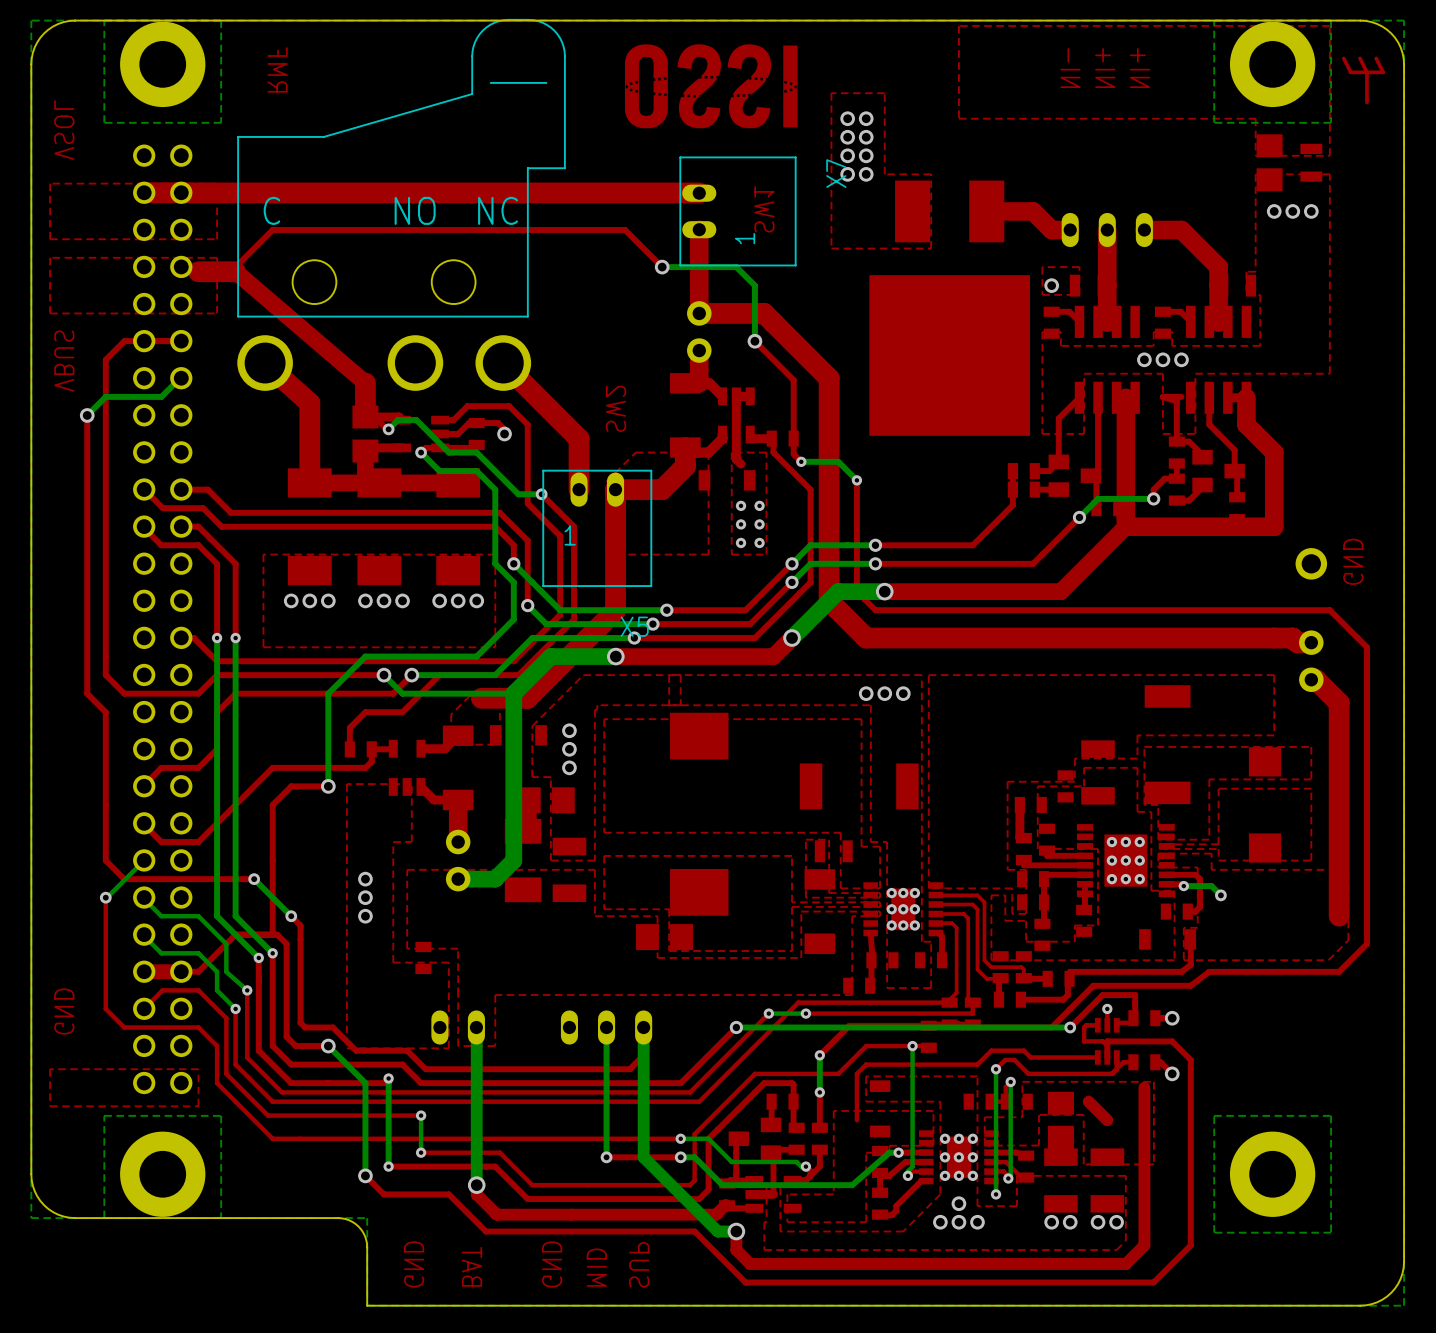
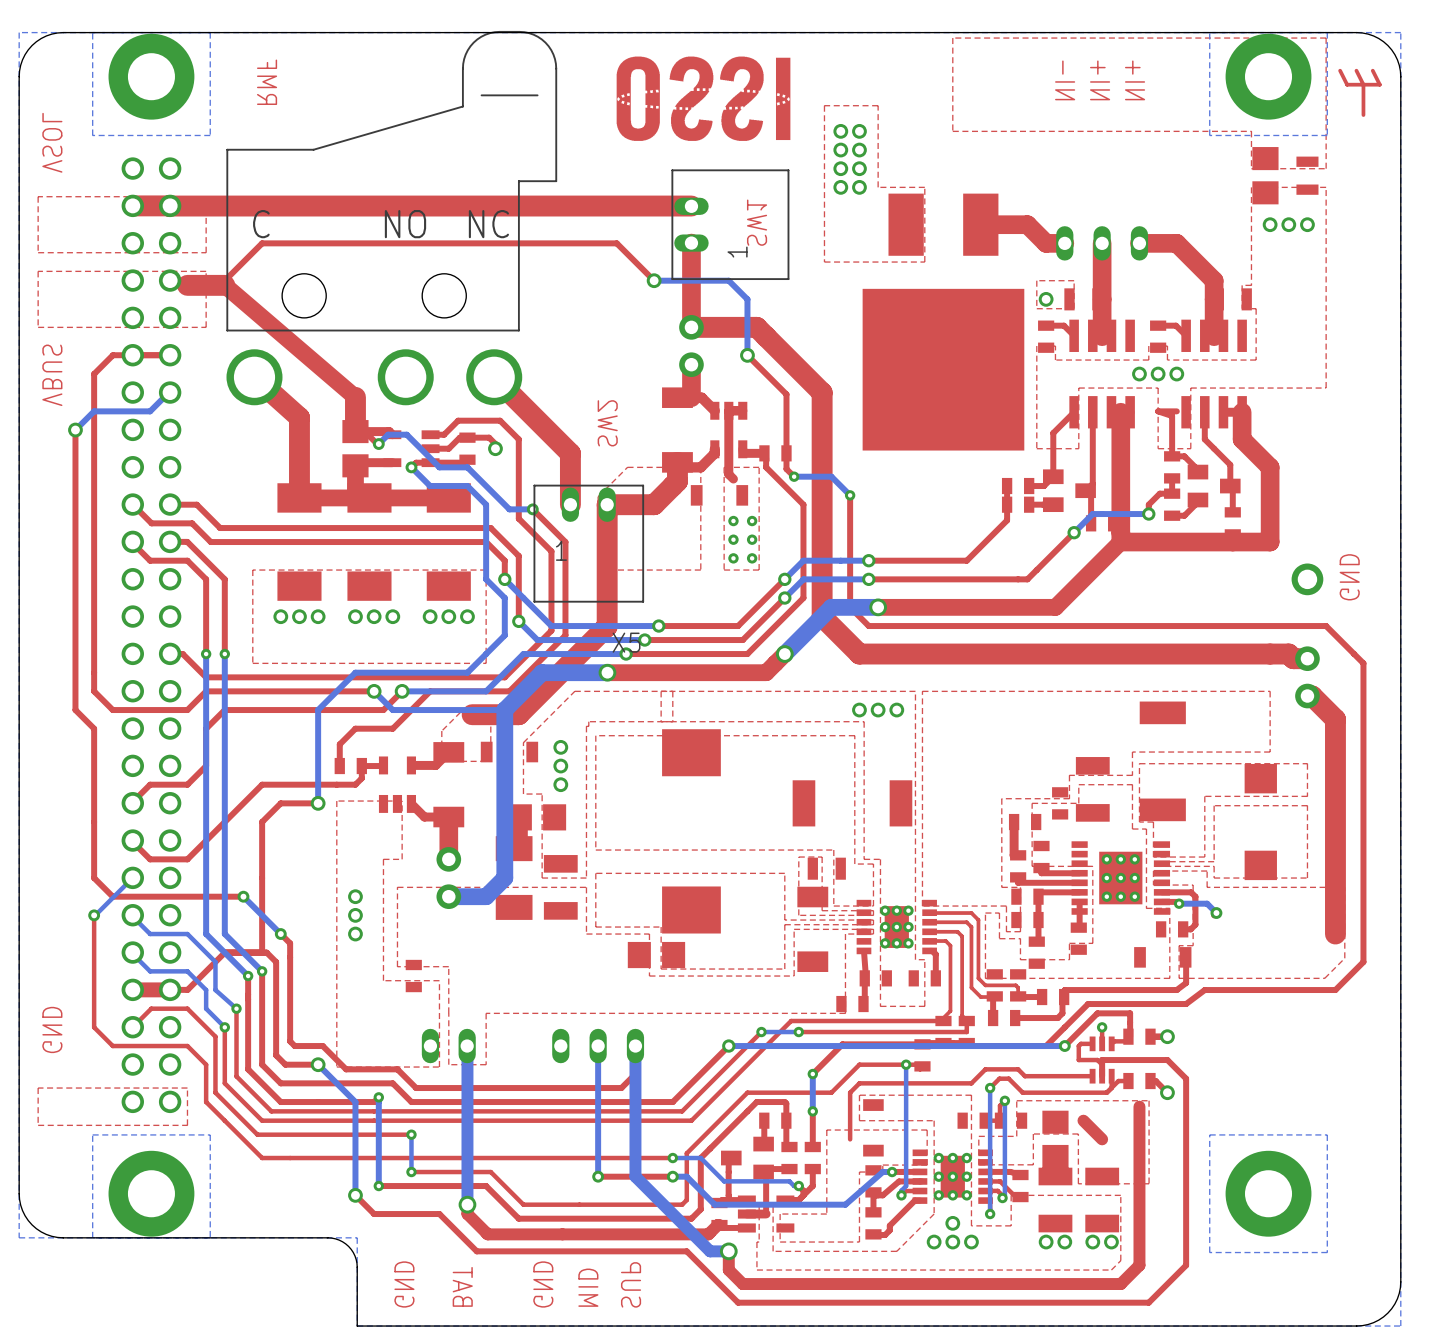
X7 name: X7 (836, 173) -> none

